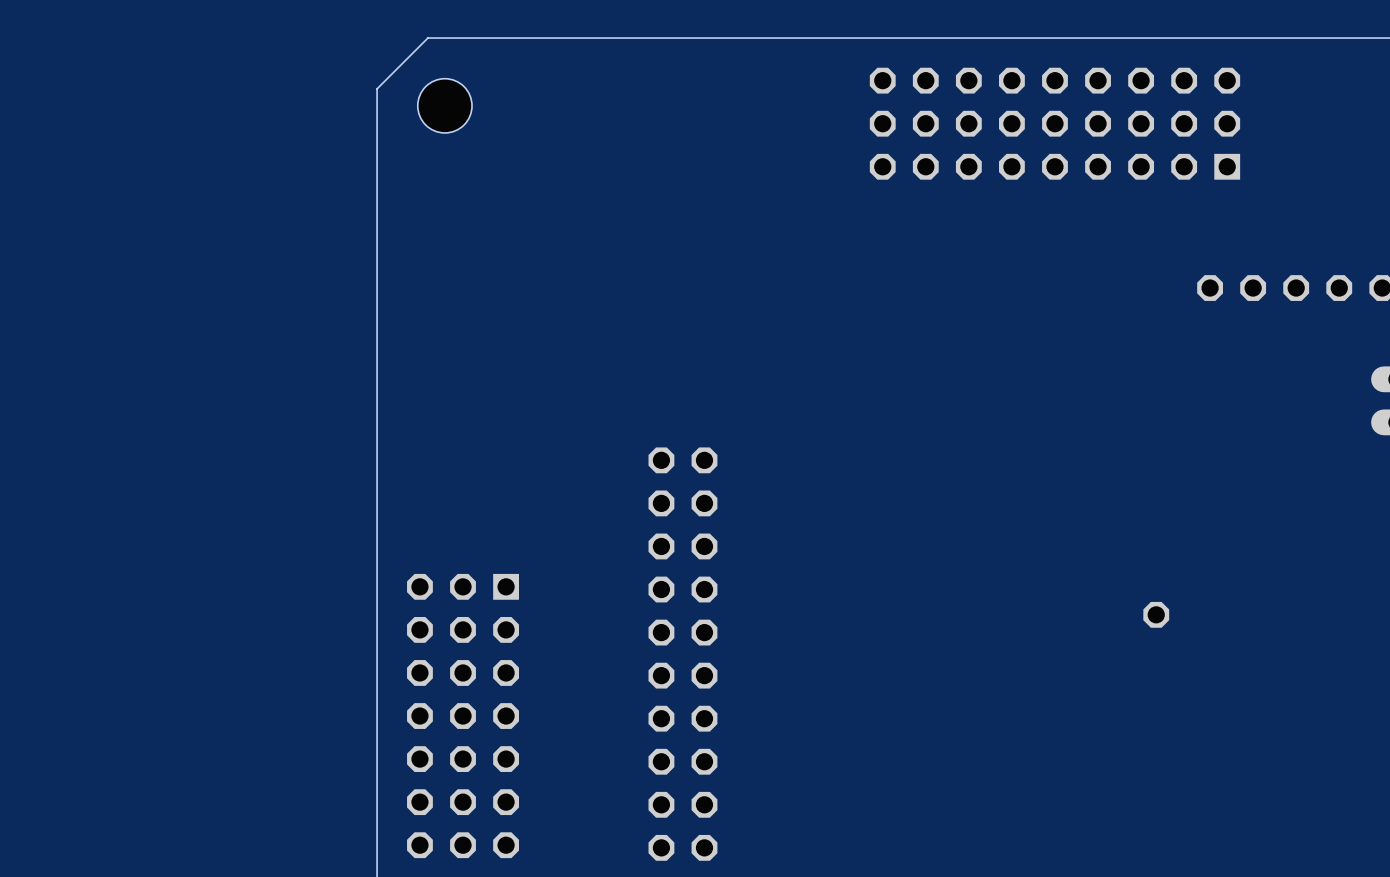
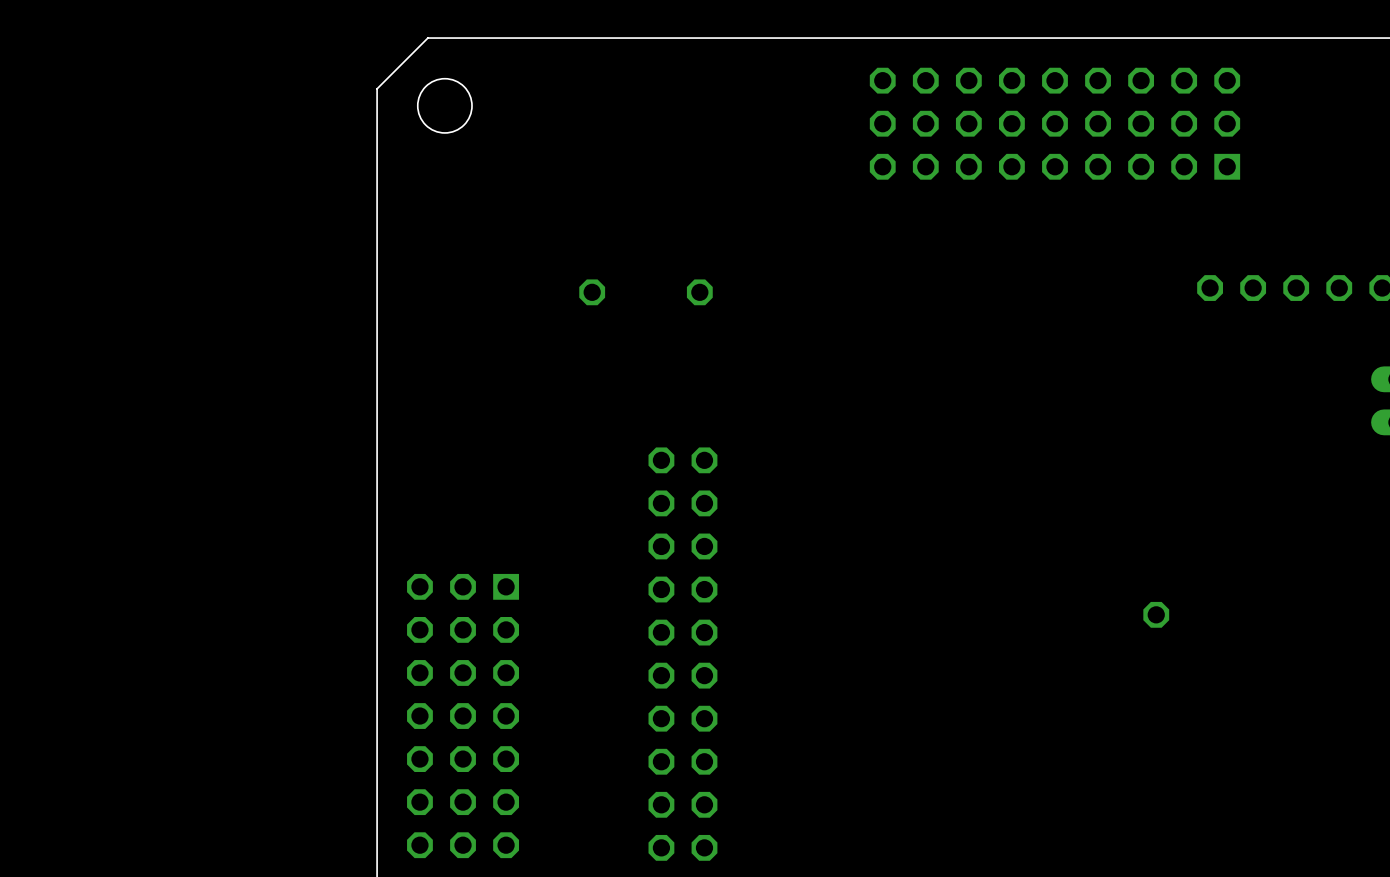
part: none -> (592, 292)
part: none -> (699, 292)

